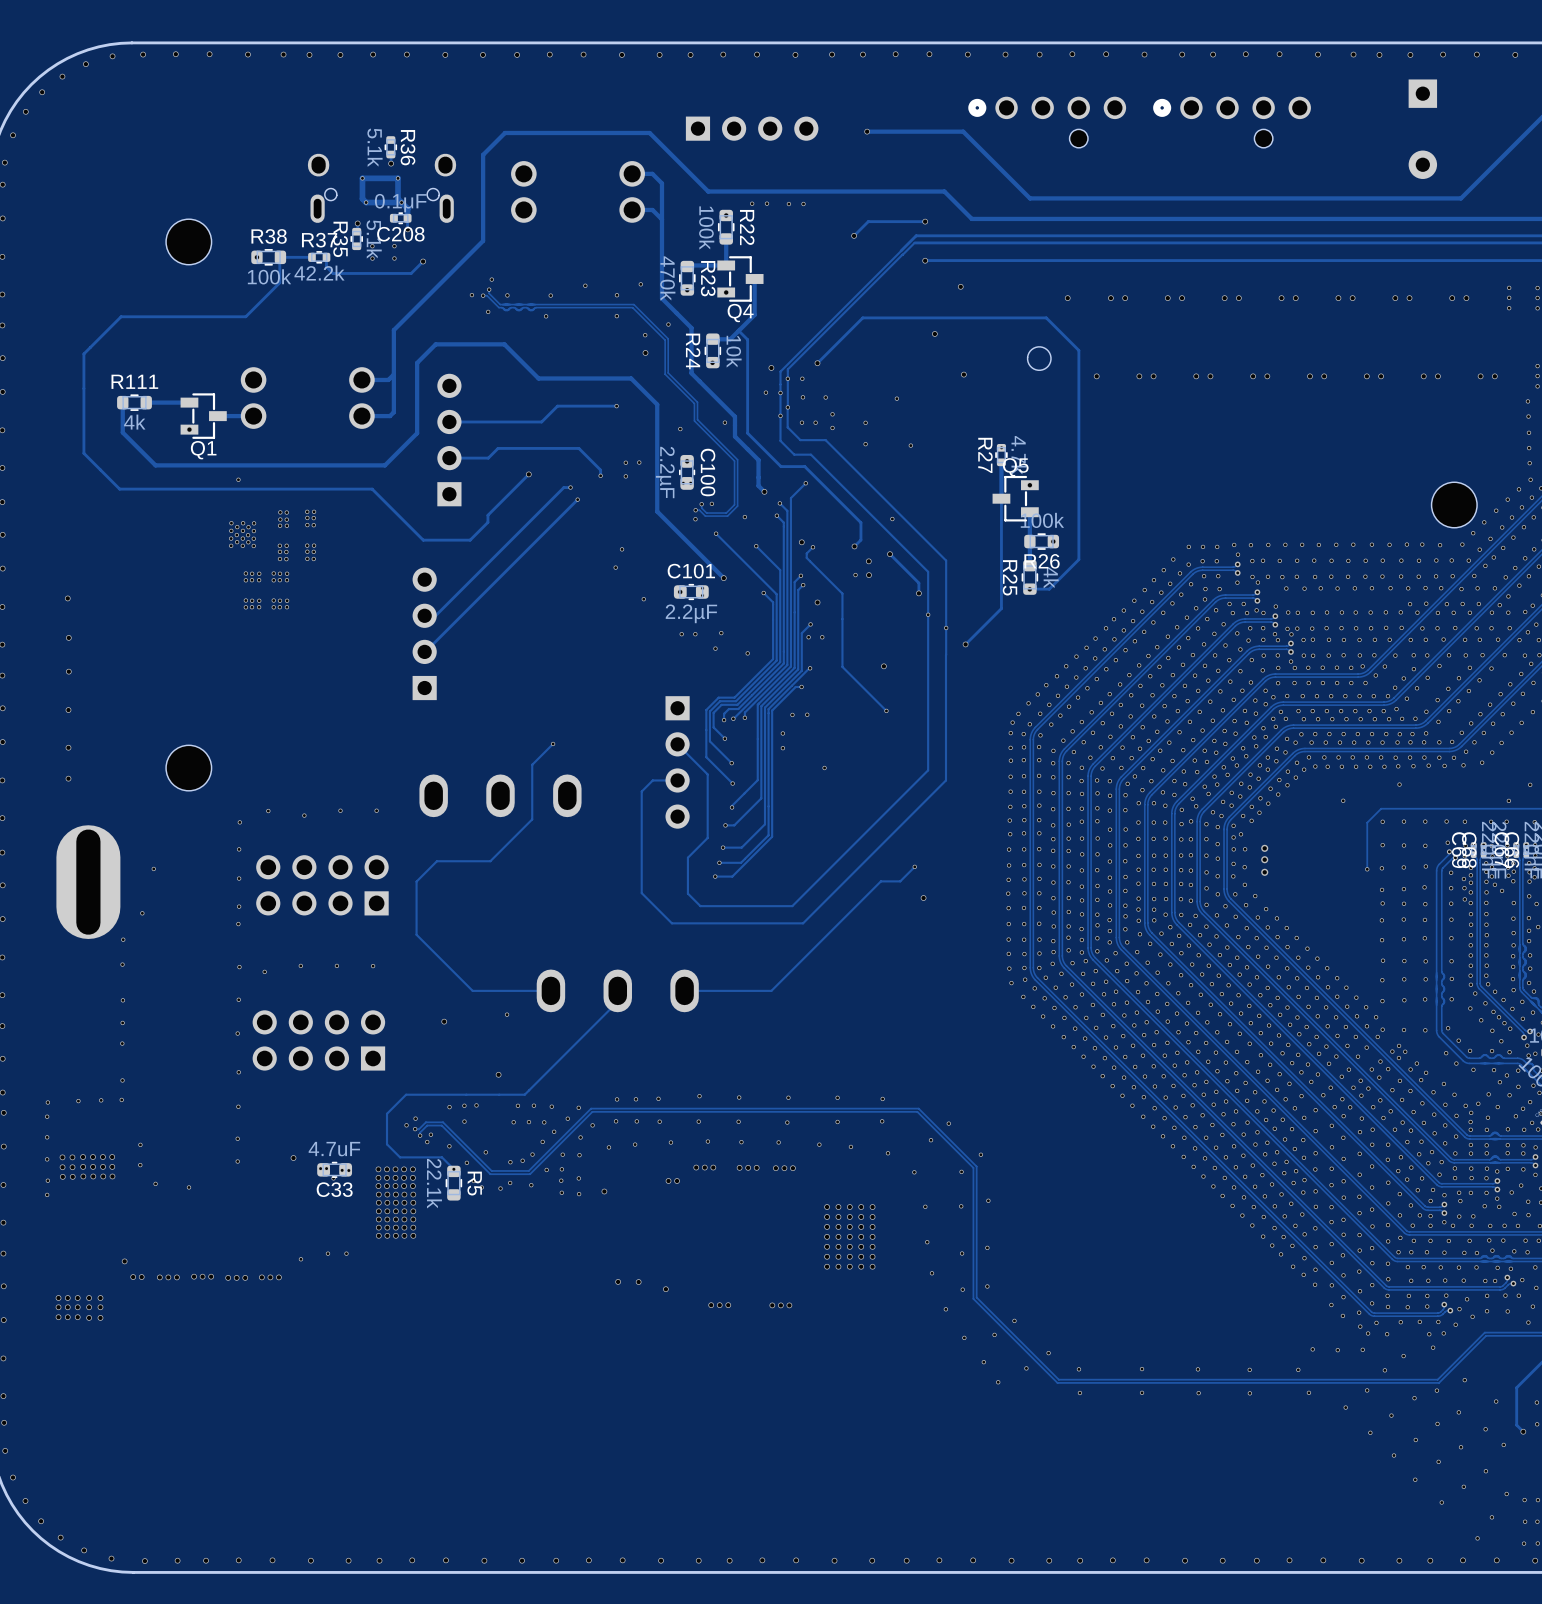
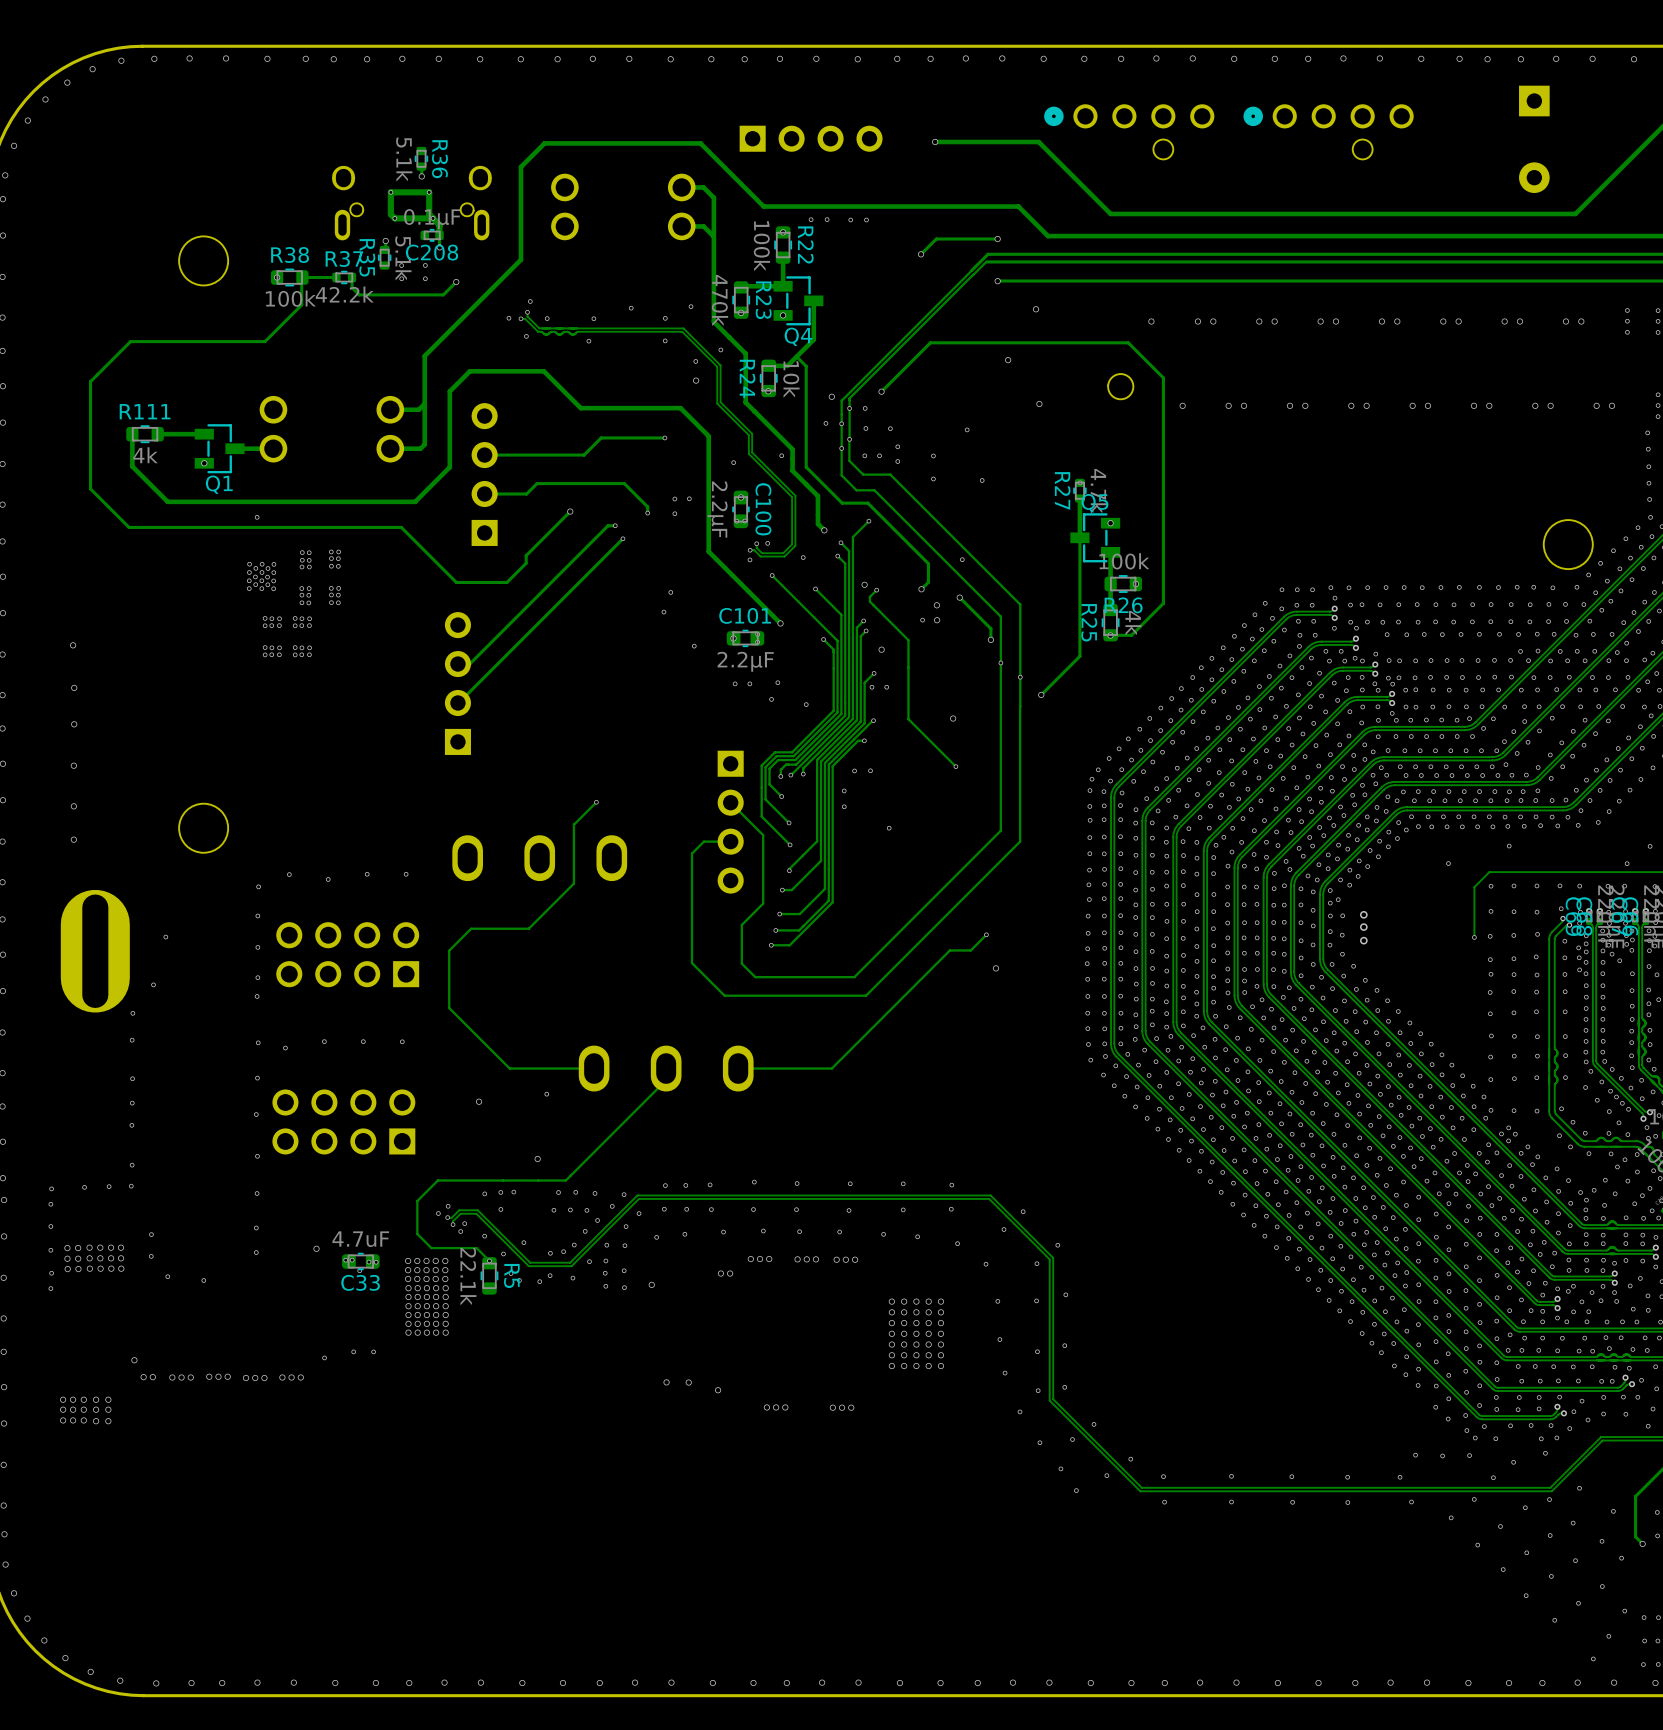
via: (1470, 1192) -> none
via: none -> (1568, 1291)
via: none -> (1592, 1292)
via: (1460, 1201) -> none
via: none -> (1581, 1301)

